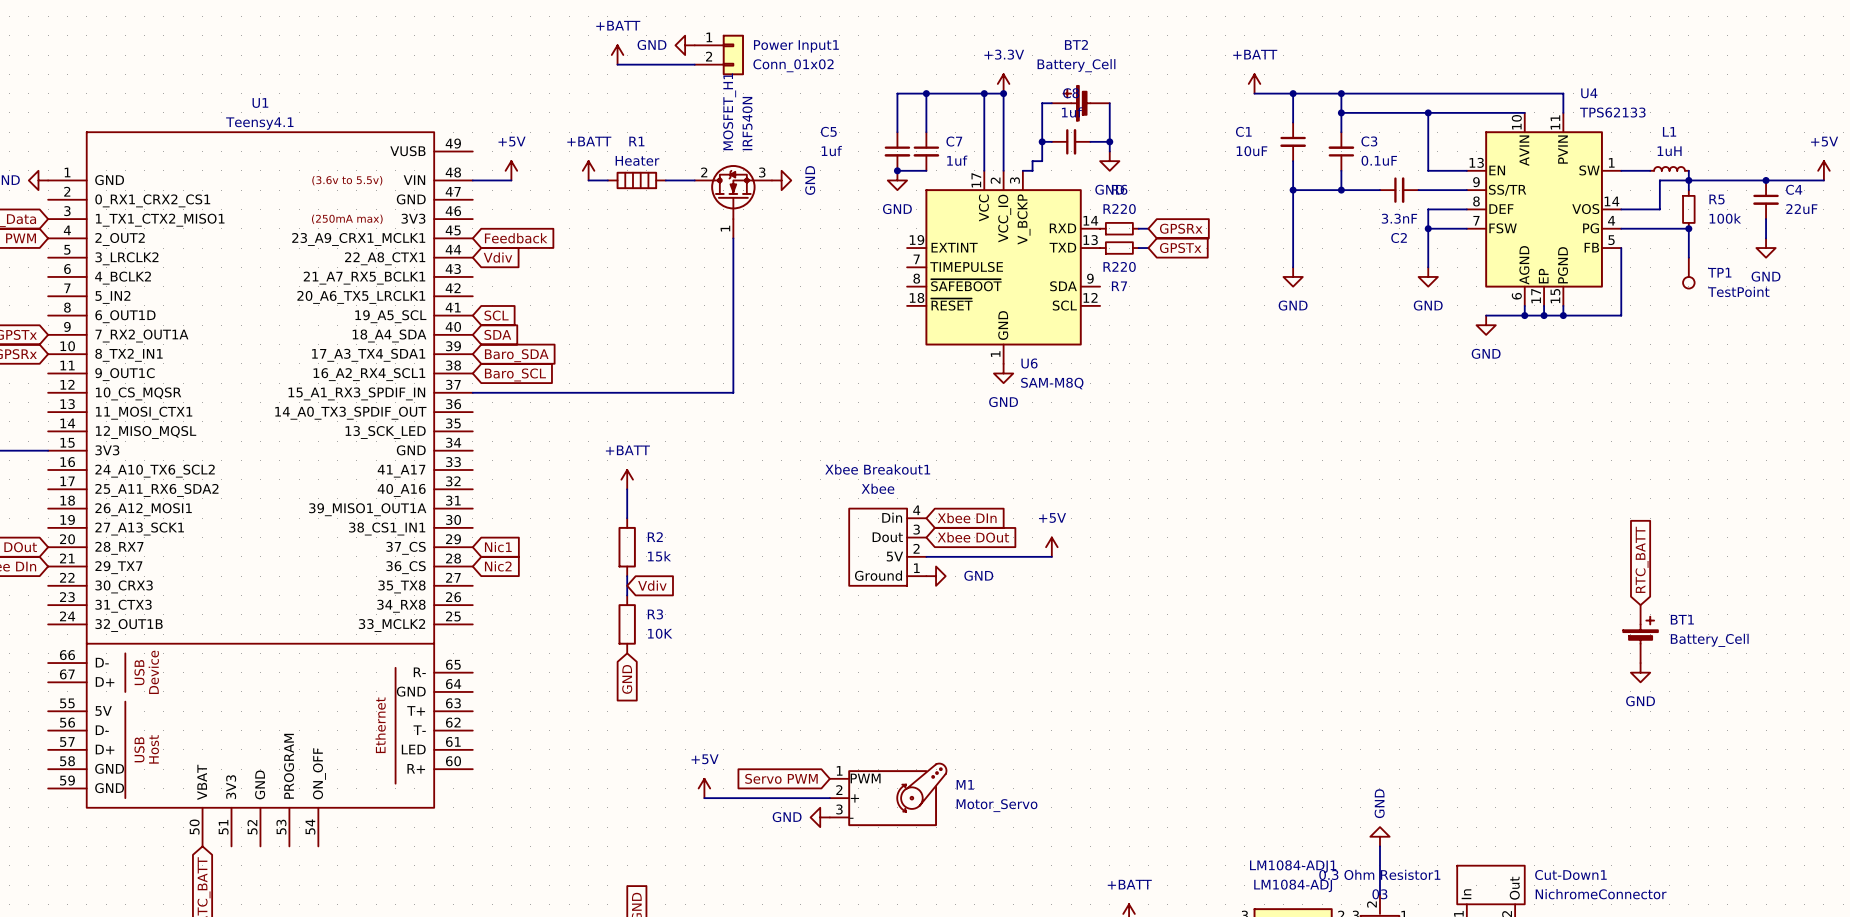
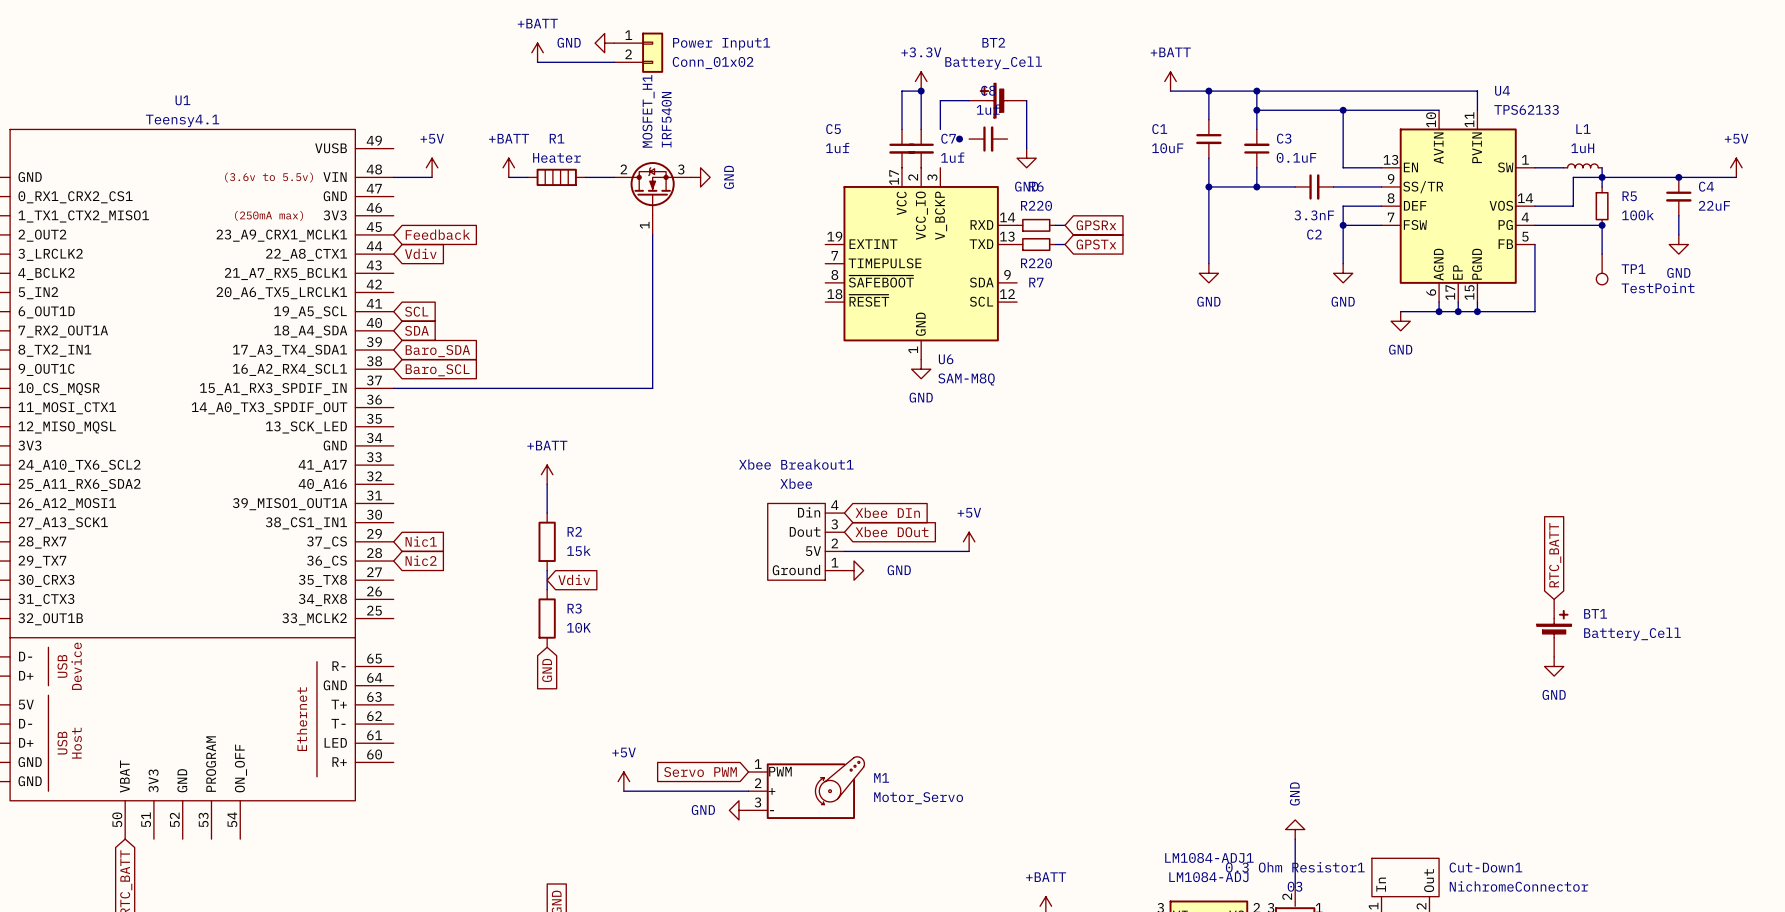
wire: (926, 93) (926, 132) -> none
junction: (926, 93) -> none
wire: (984, 93) (897, 93) (897, 132) -> none
junction: (984, 93) -> none
wire: (1042, 103) (1042, 161) (1032, 161) (1032, 170) (1022, 170) -> (959, 100) (940, 100) (940, 129)
wire: (1042, 141) (1051, 141) -> none
wire: (1090, 141) (1109, 141) -> none
junction: (1109, 141) -> none
C5 position: (897, 151) -> (901, 148)
C7 position: (926, 151) -> (921, 148)
wire: (897, 170) (926, 170) -> none
junction: (897, 170) -> none
power symbol: GND (897, 180) -> none

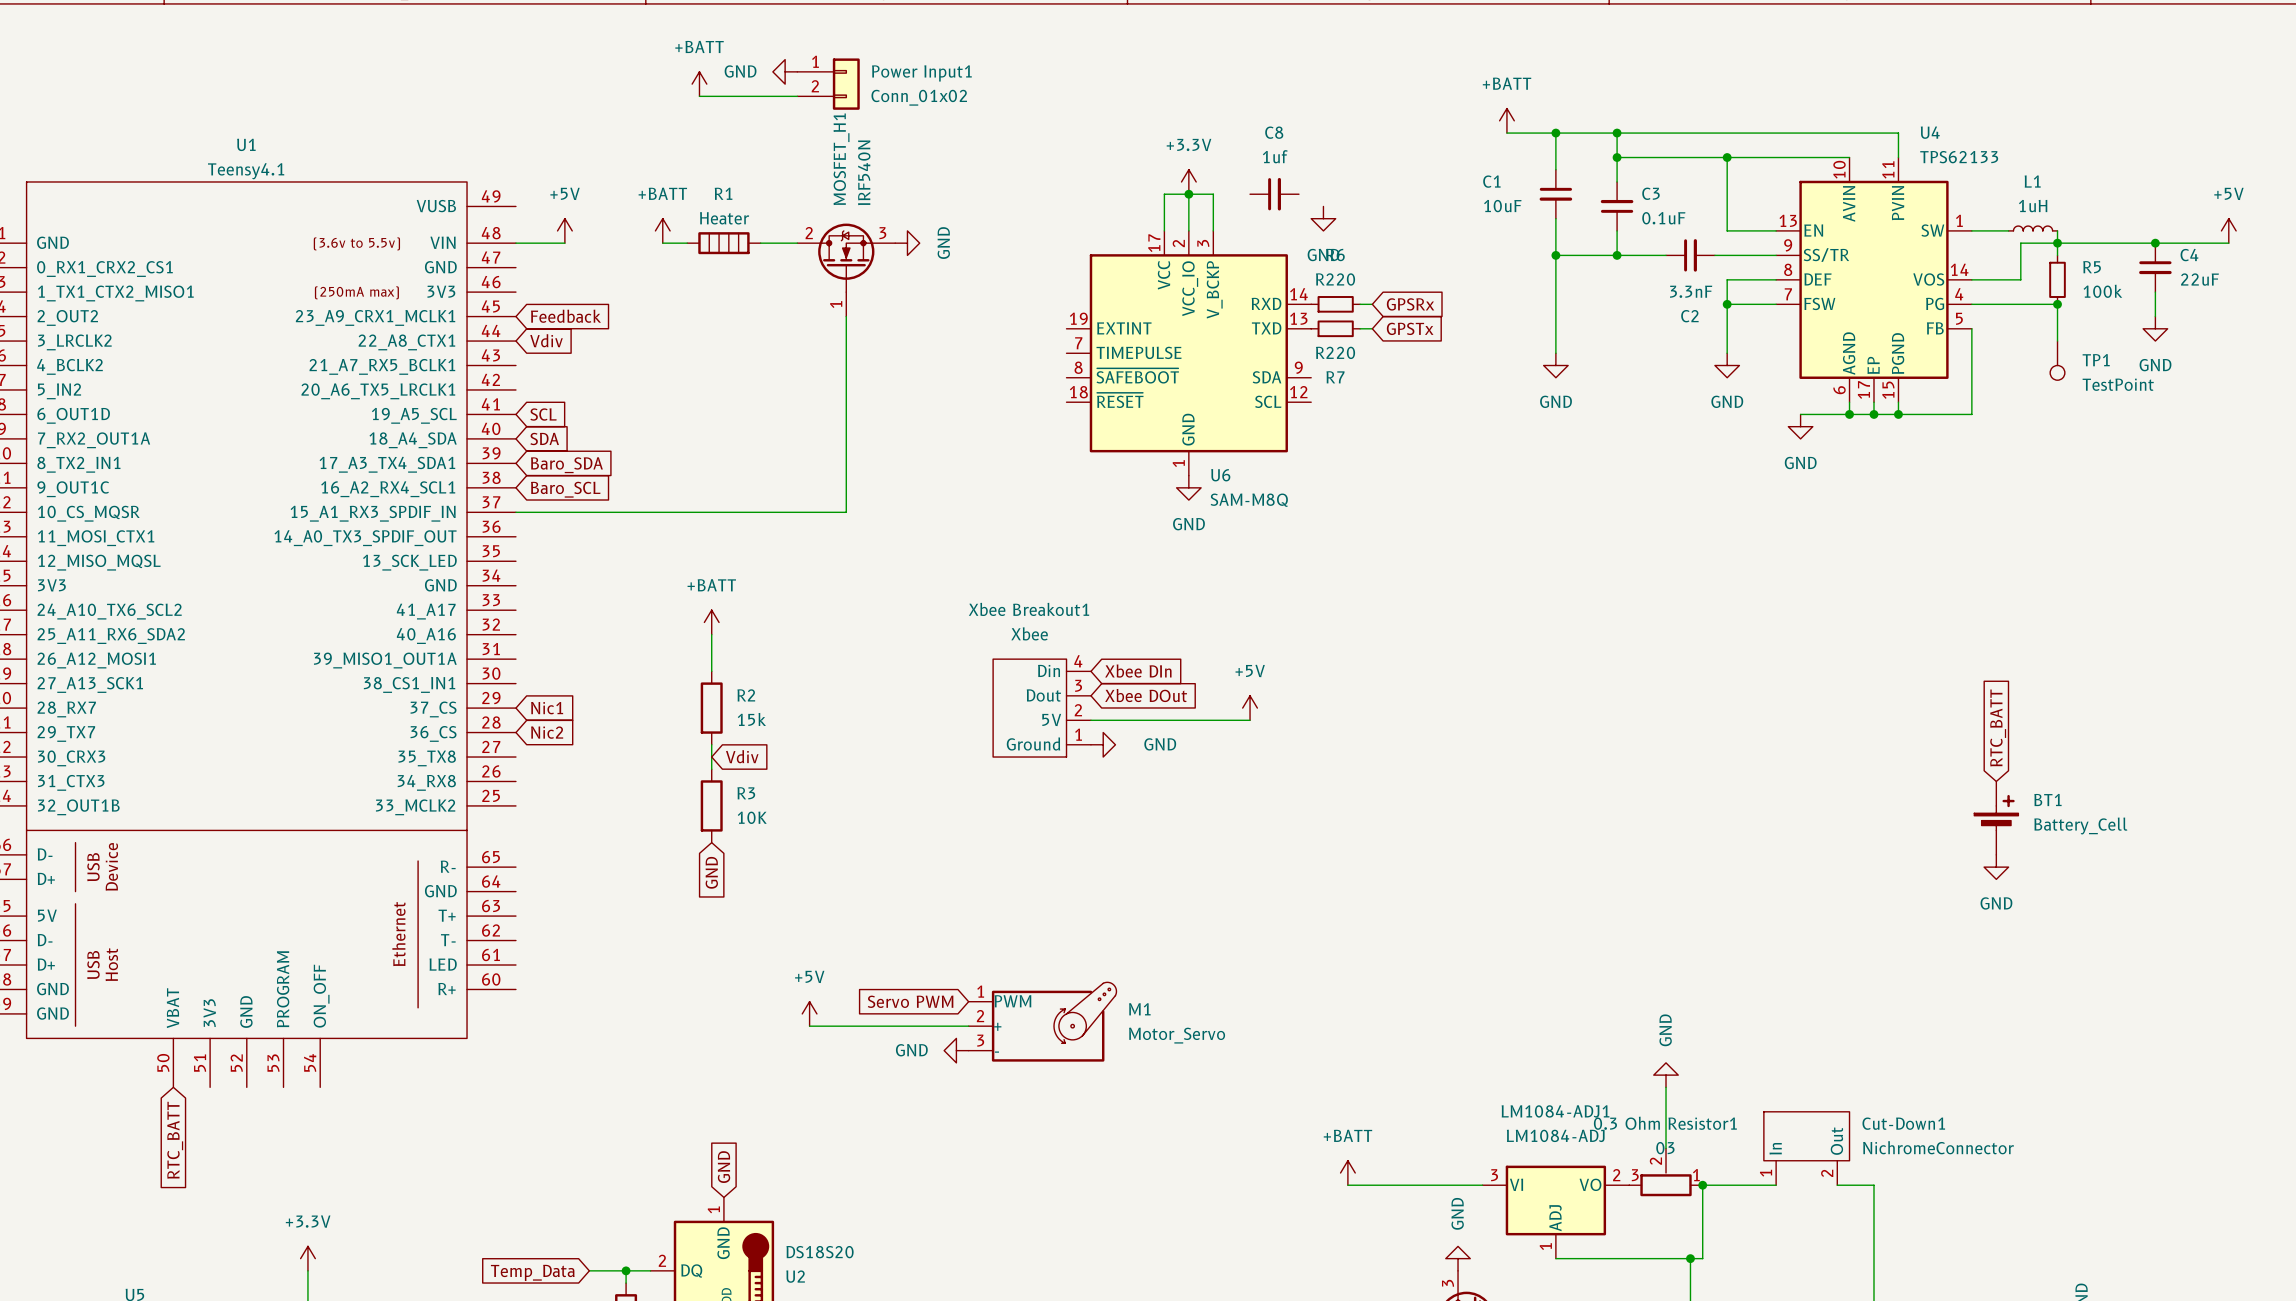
power symbol position: +3.3V (921, 81) -> +3.3V (1188, 181)
junction: (921, 91) -> none
wire: (969, 100) (940, 100) (940, 129) -> none
BT2: Battery_Cell (997, 100) -> none
wire: (1026, 100) (1026, 148) -> none
wire: (901, 129) (901, 91) (921, 91) (921, 129) -> none
junction: none -> (1188, 194)
junction: (959, 139) -> none
C5: 1uf (901, 148) -> none
C7: 1uf (921, 148) -> none
wire: none -> (1164, 230) (1164, 194) (1213, 194) (1213, 230)

